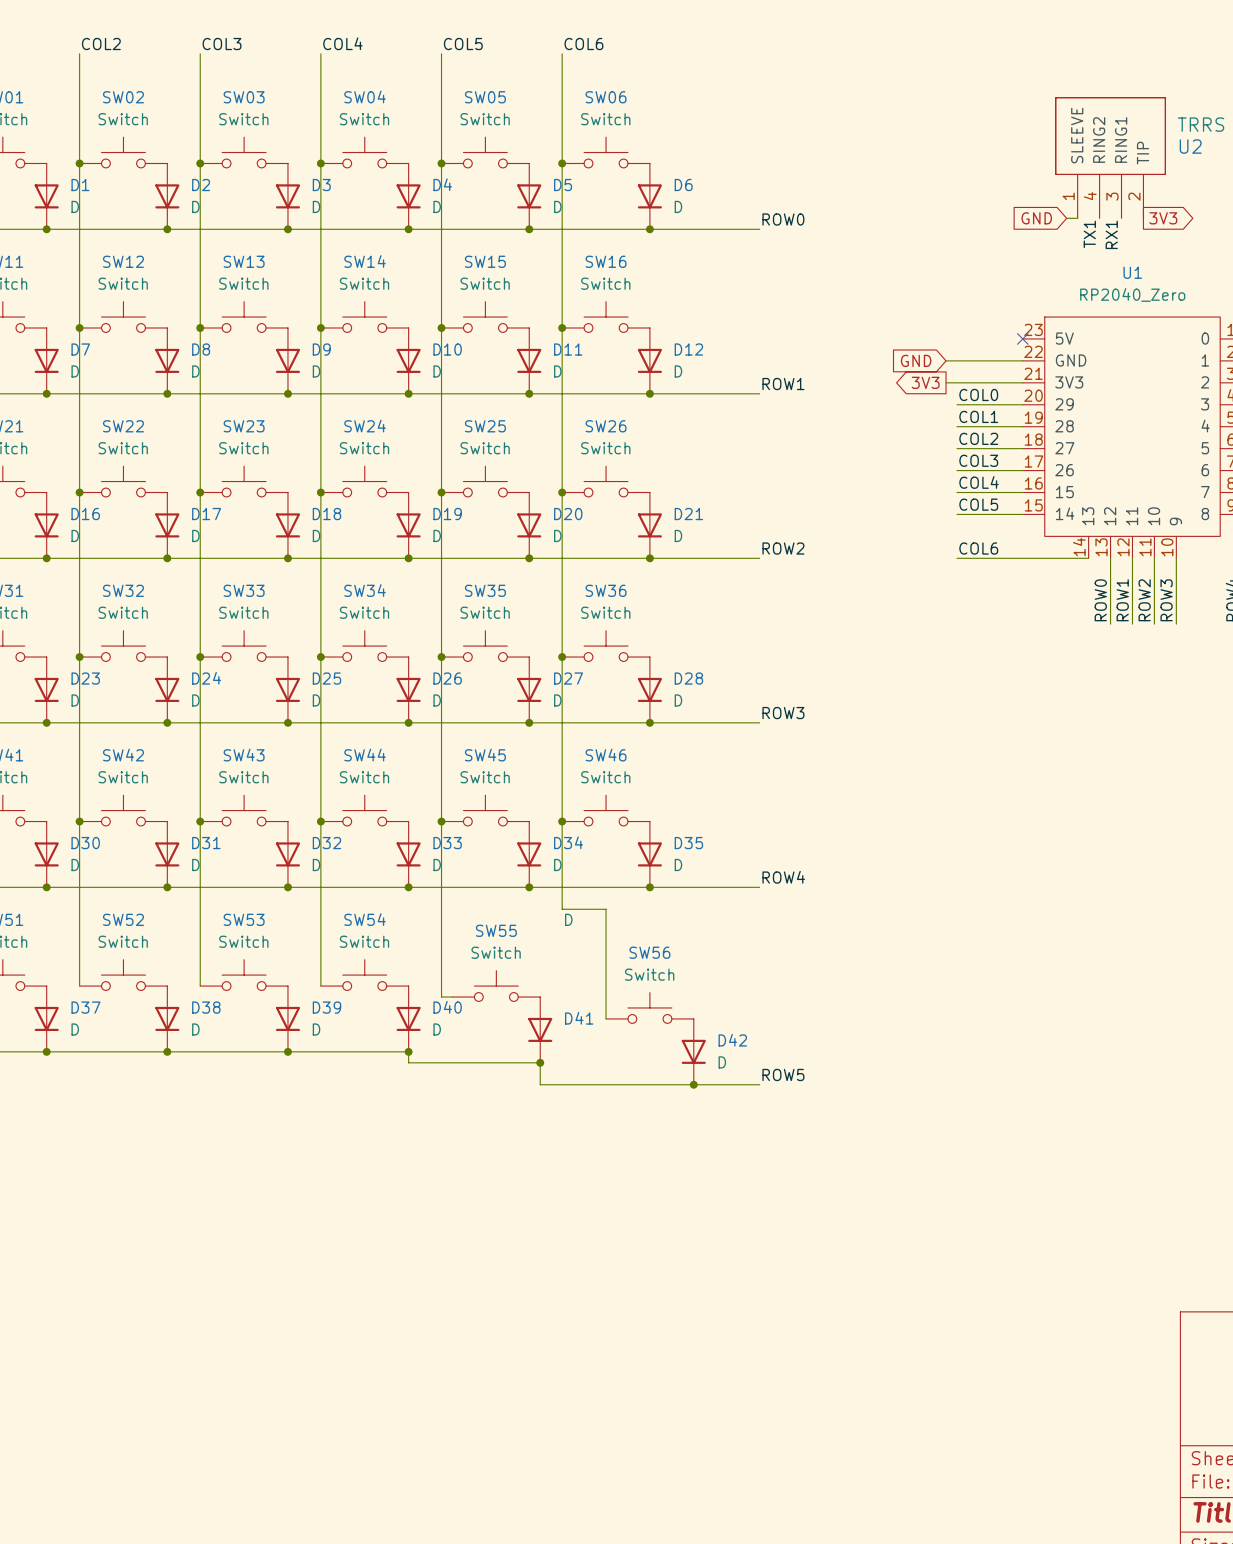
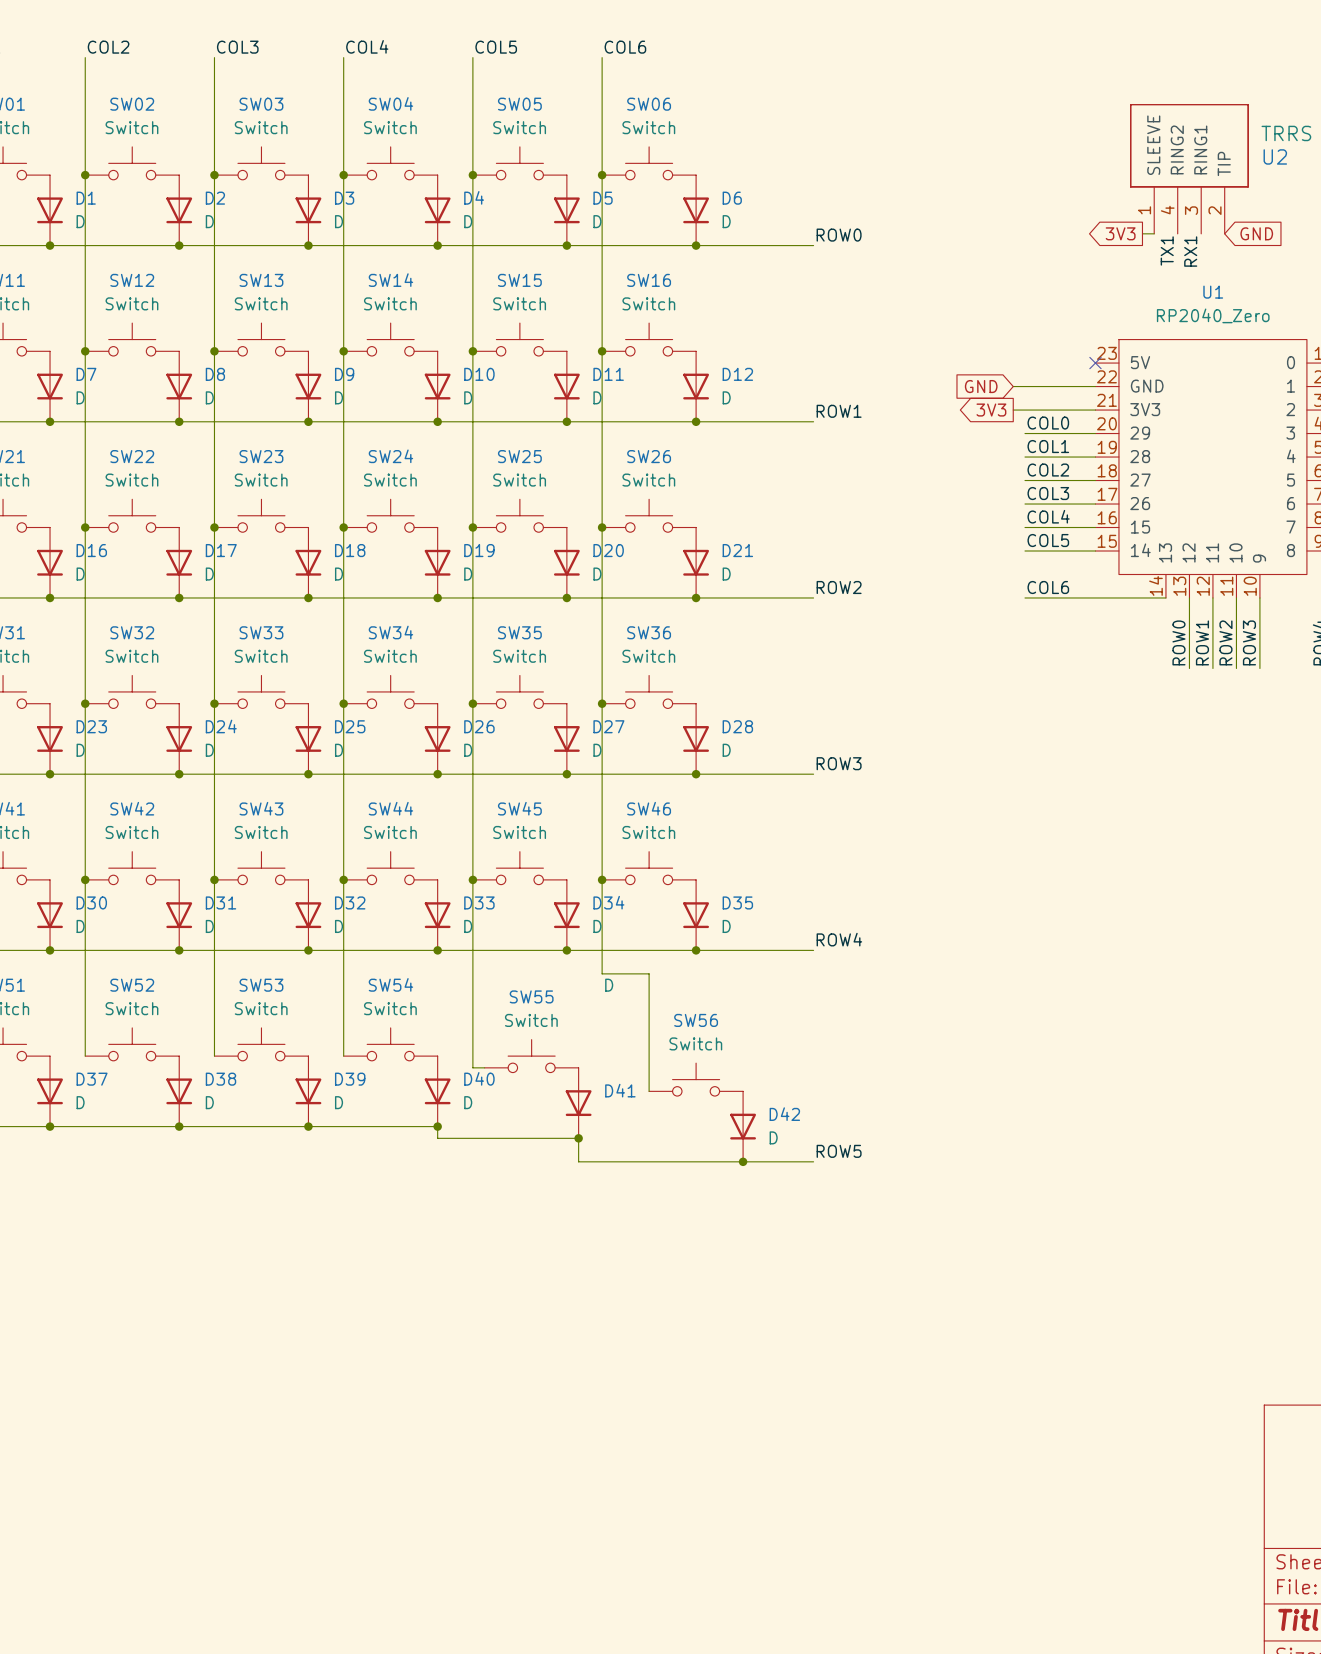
global label shape: input (1036, 218) -> output (1120, 233)
global label: GND (1036, 218) -> 3V3 (1120, 233)
global label shape: output (1163, 218) -> input (1256, 233)
global label: 3V3 (1163, 218) -> GND (1256, 233)

